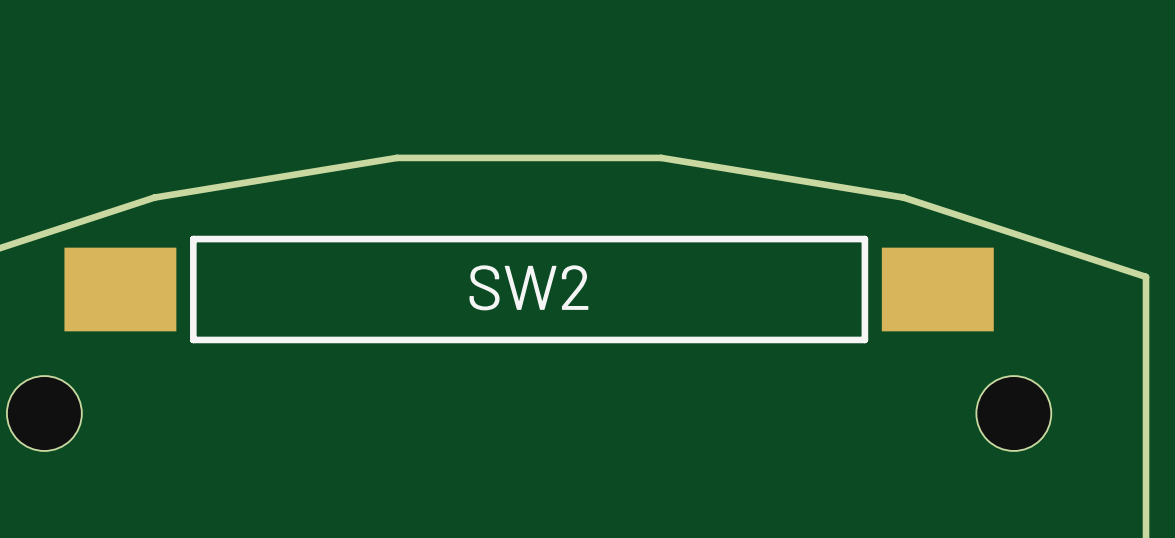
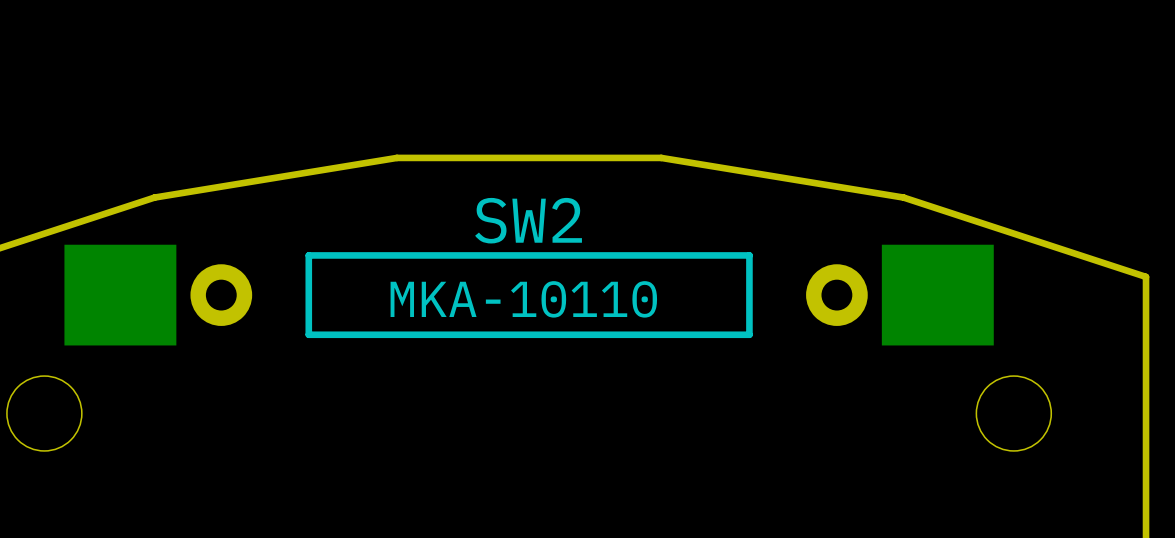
SW2 footprint: [64, 235, 994, 344] -> [64, 244, 994, 346]
SW2 value: none -> MKA-10110 (523, 299)

